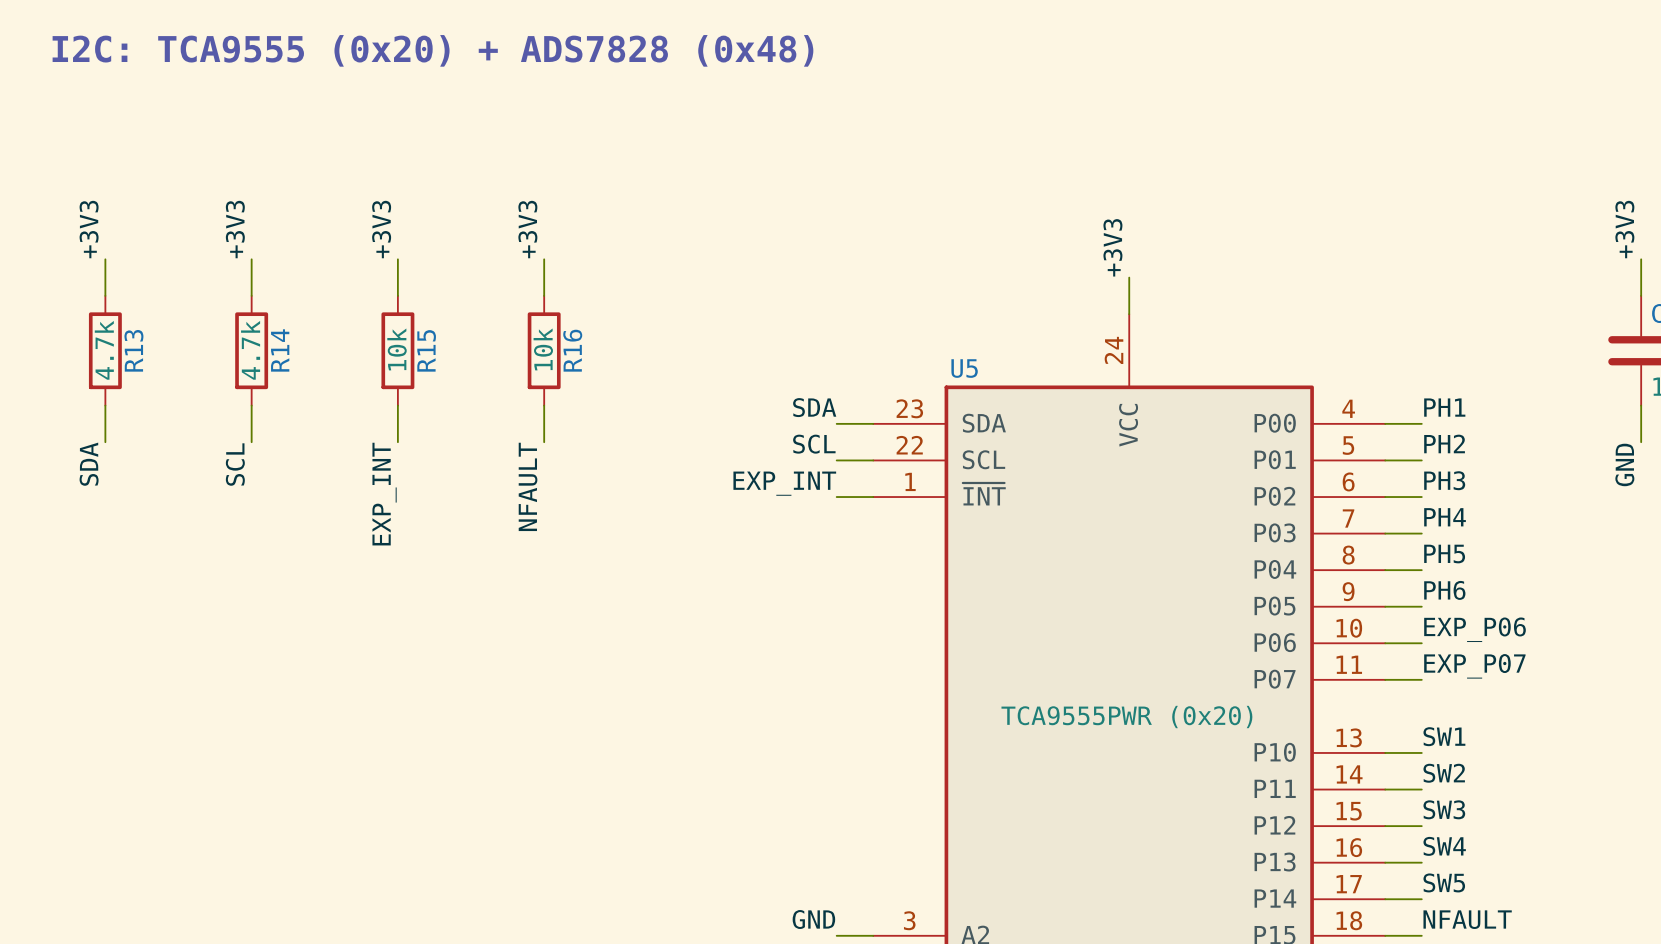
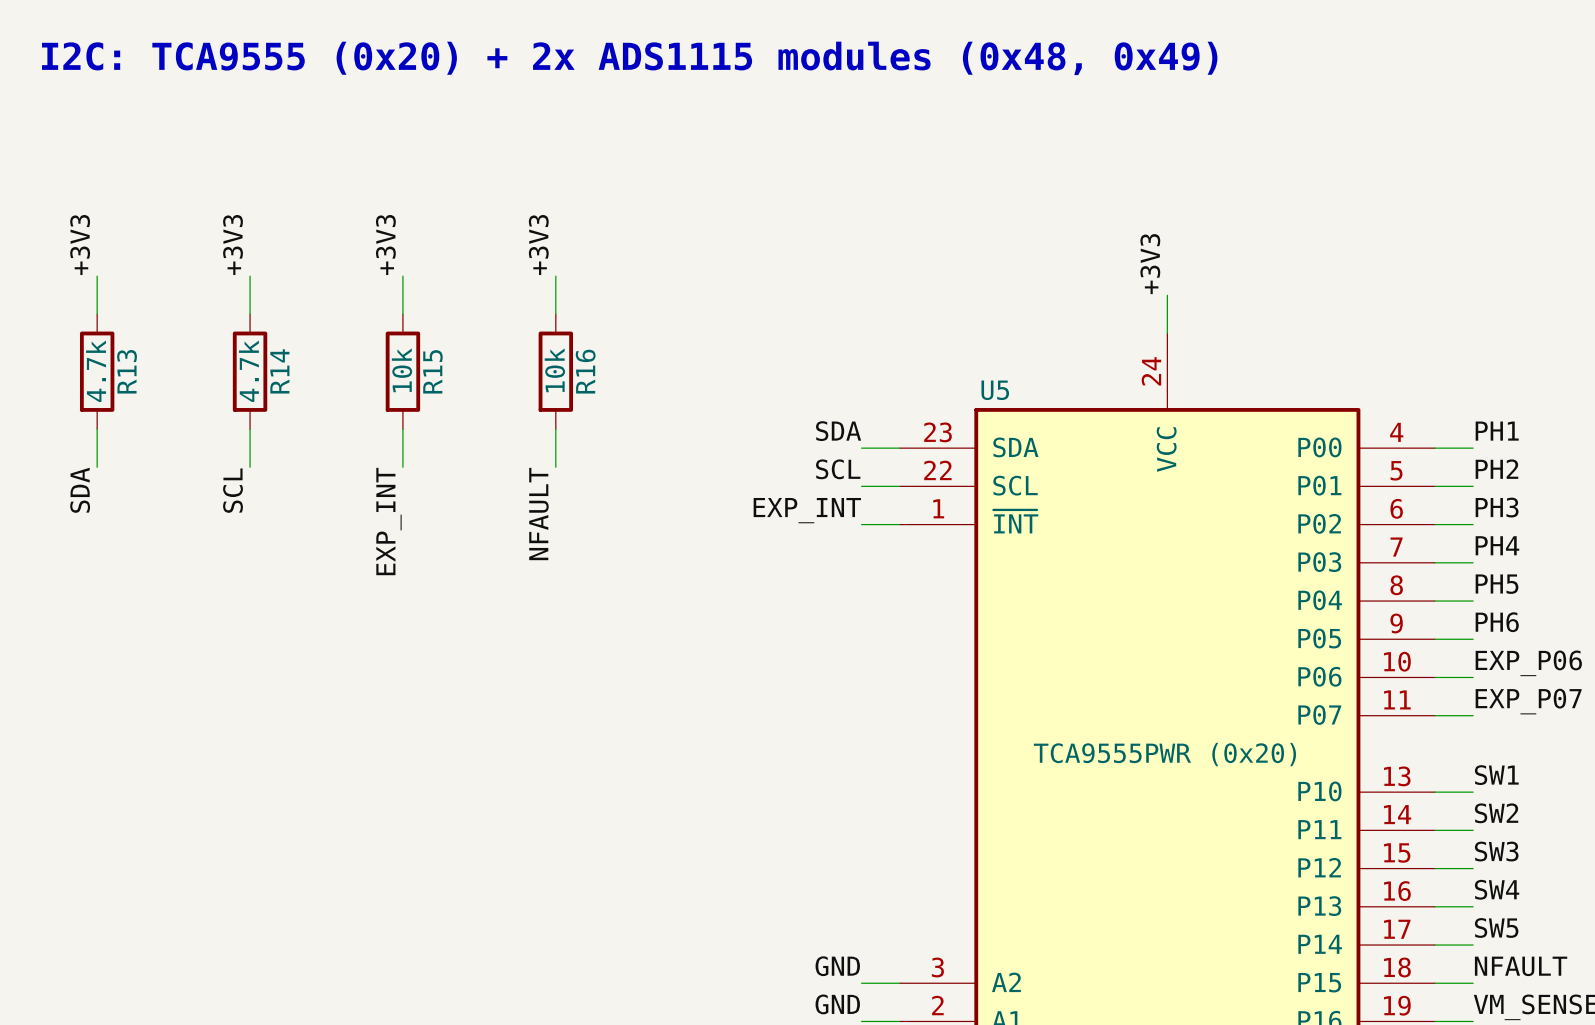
text: I2C: TCA9555 (0x20) + ADS7828 (0x48) (432, 50) -> I2C: TCA9555 (0x20) + 2x ADS1115 modules (0x48, 0x49) (629, 58)

